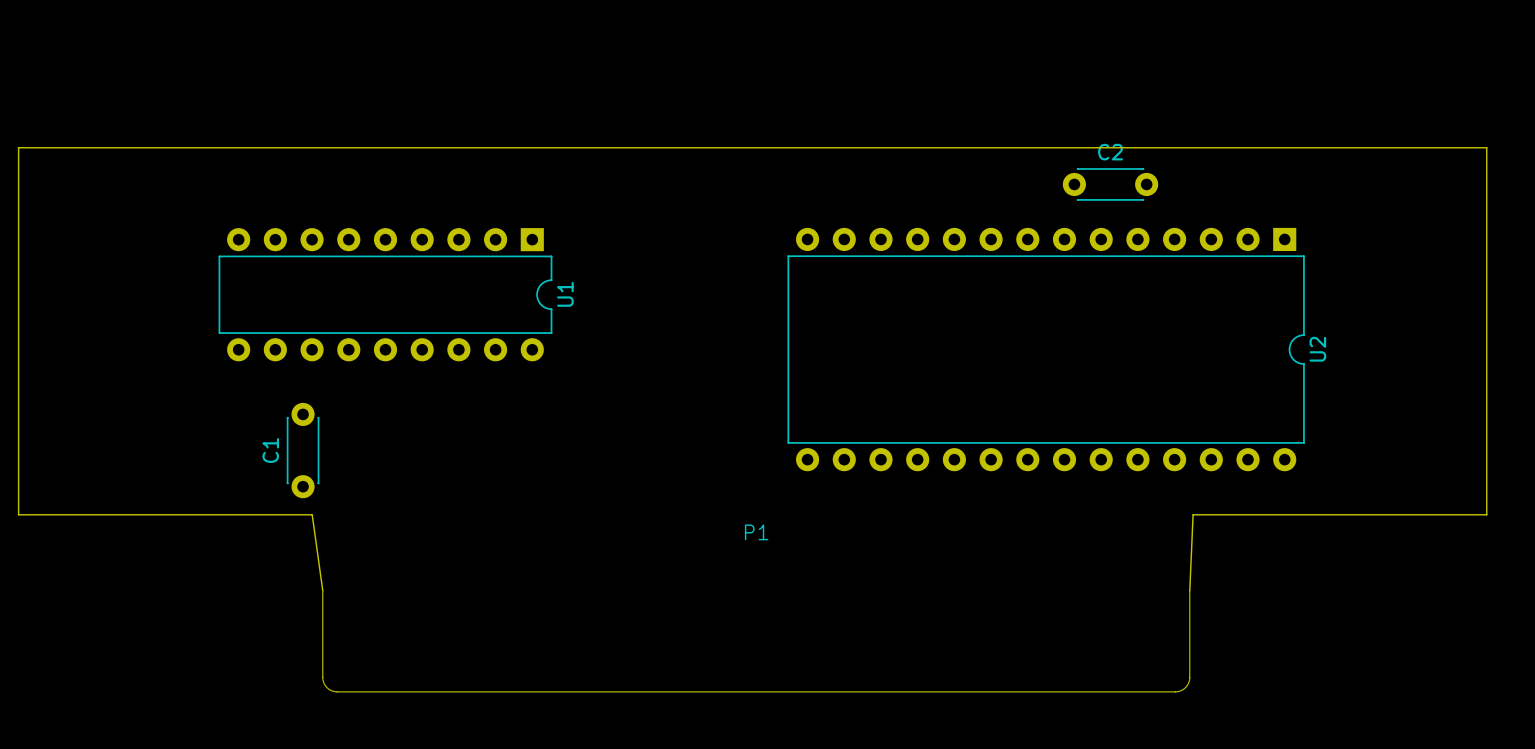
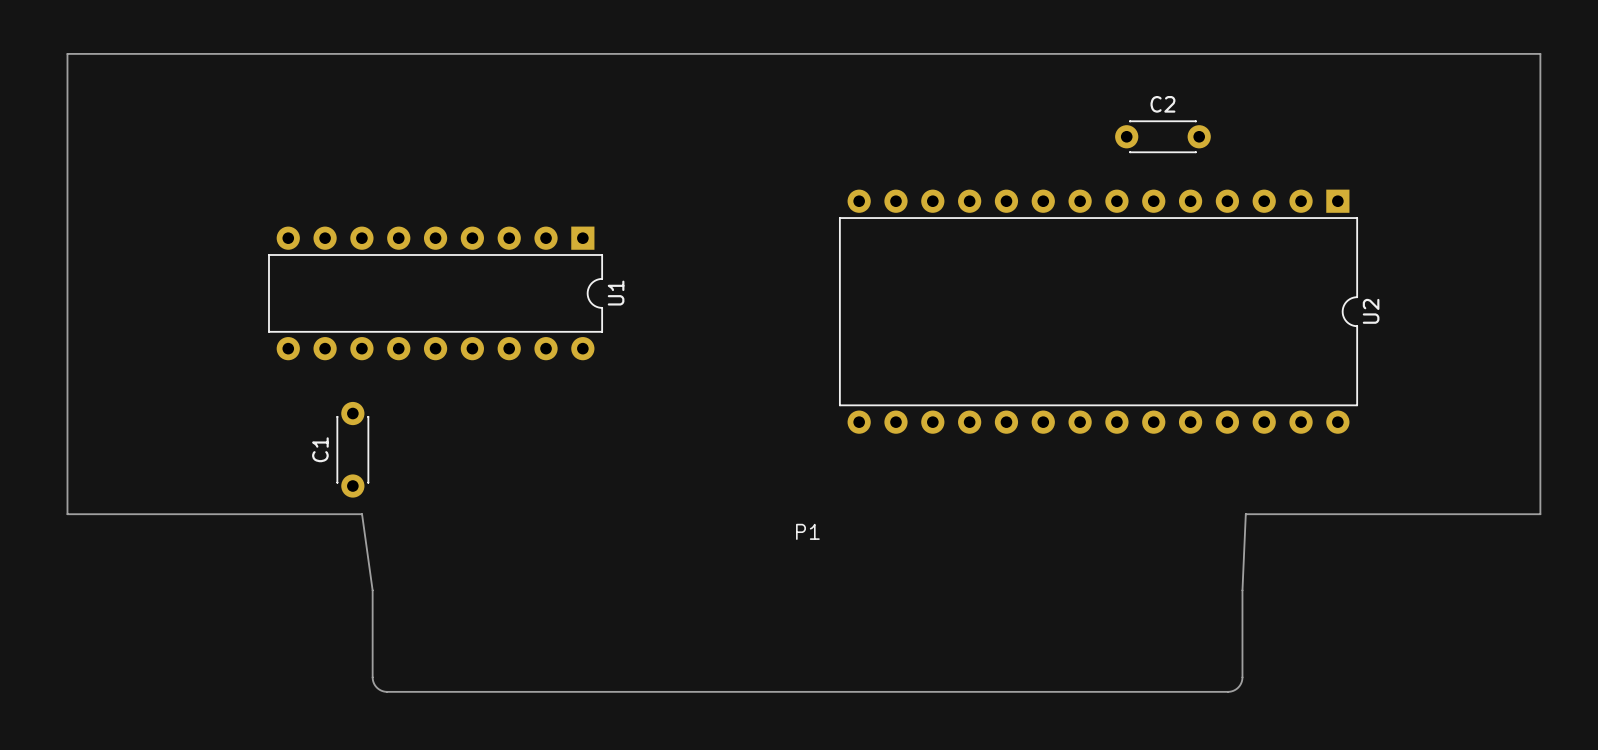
board edge: (18, 147) (1486, 147) -> (67, 145) (67, 53) (1540, 53) (1540, 145)
C2 position: (1110, 184) -> (1162, 136)
U2 position: (1046, 349) -> (1098, 311)

